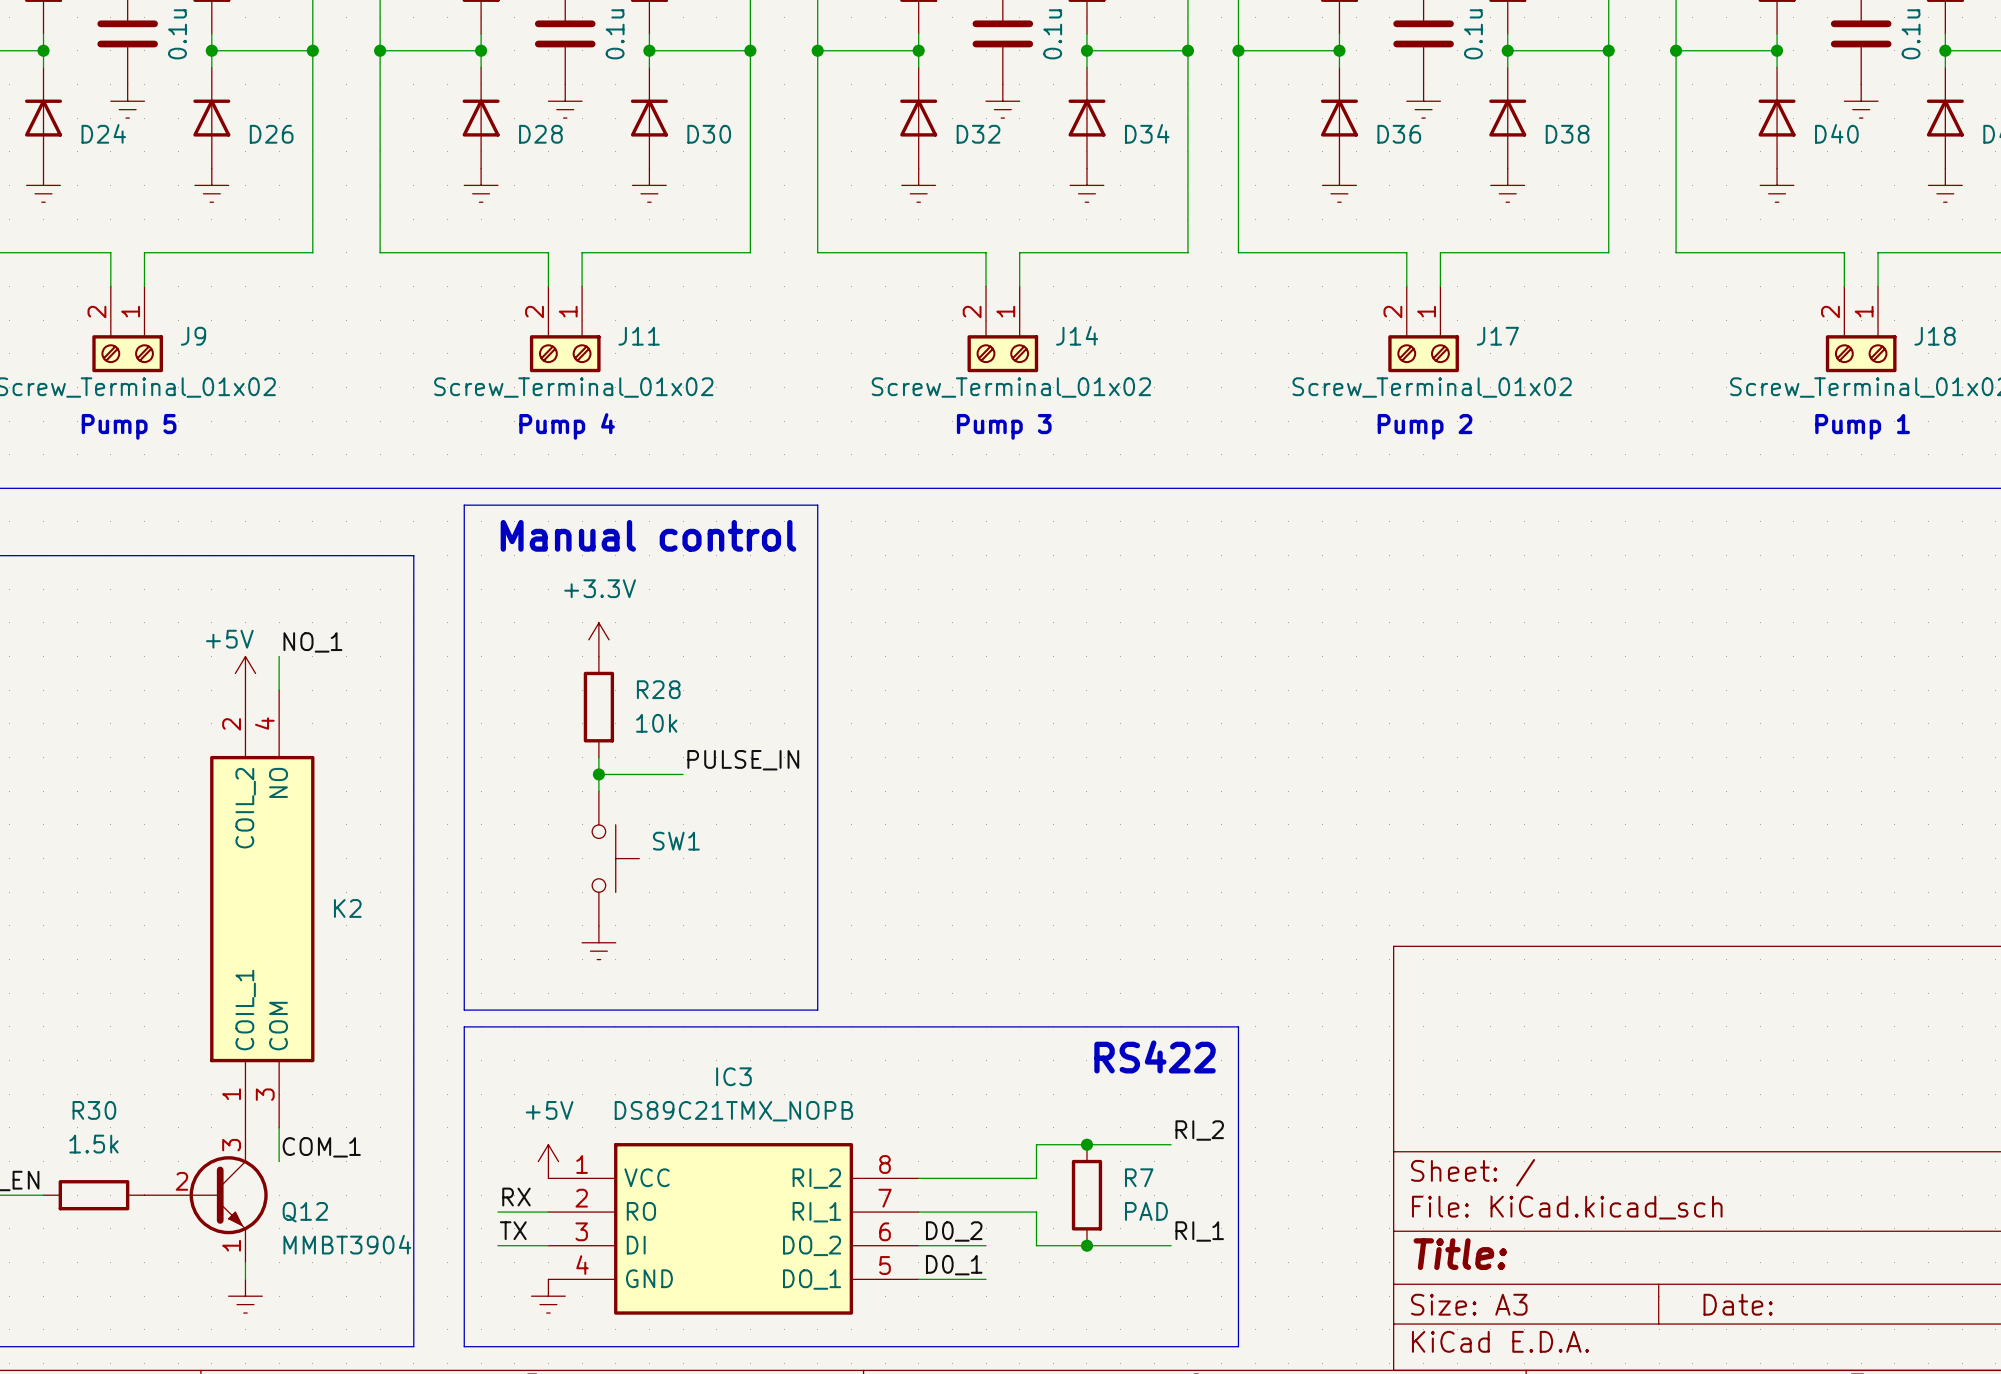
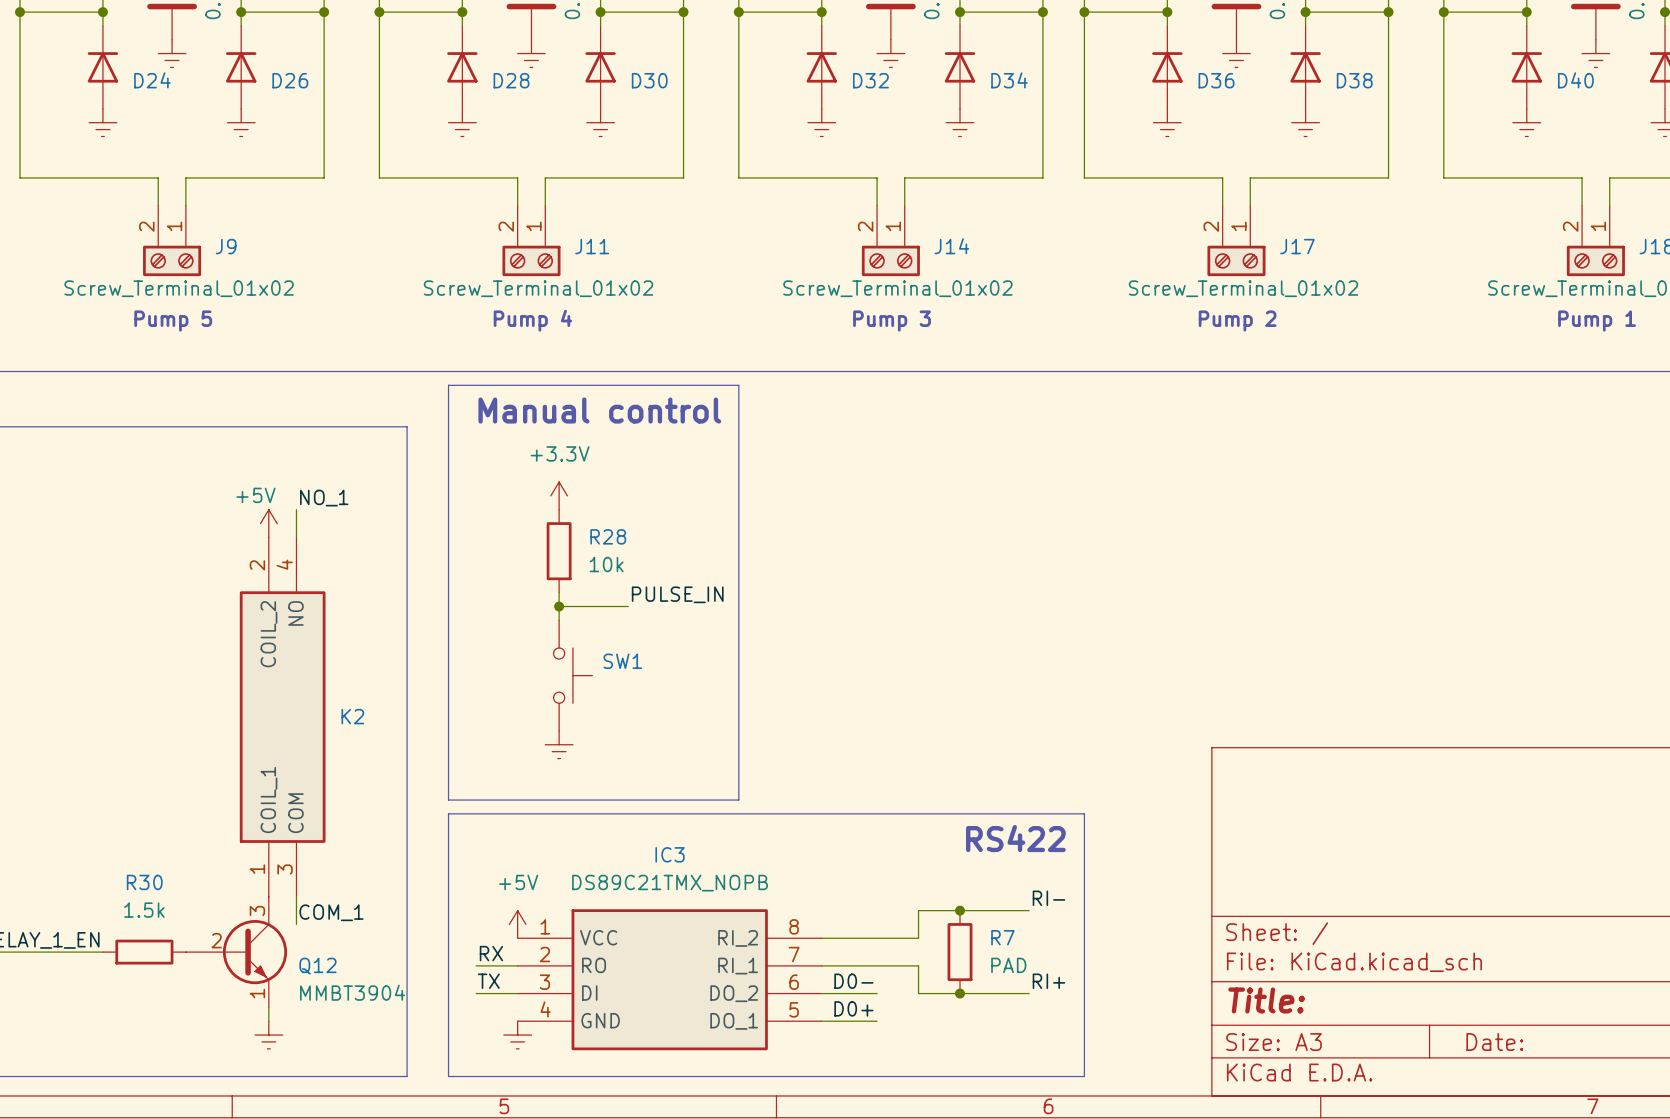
label: RI_2 (1199, 1130) -> RI- (1048, 898)
label: D0_2 (954, 1231) -> D0- (853, 981)
label: RI_1 (1199, 1231) -> RI+ (1048, 981)
label: D0_1 (954, 1265) -> D0+ (853, 1008)

